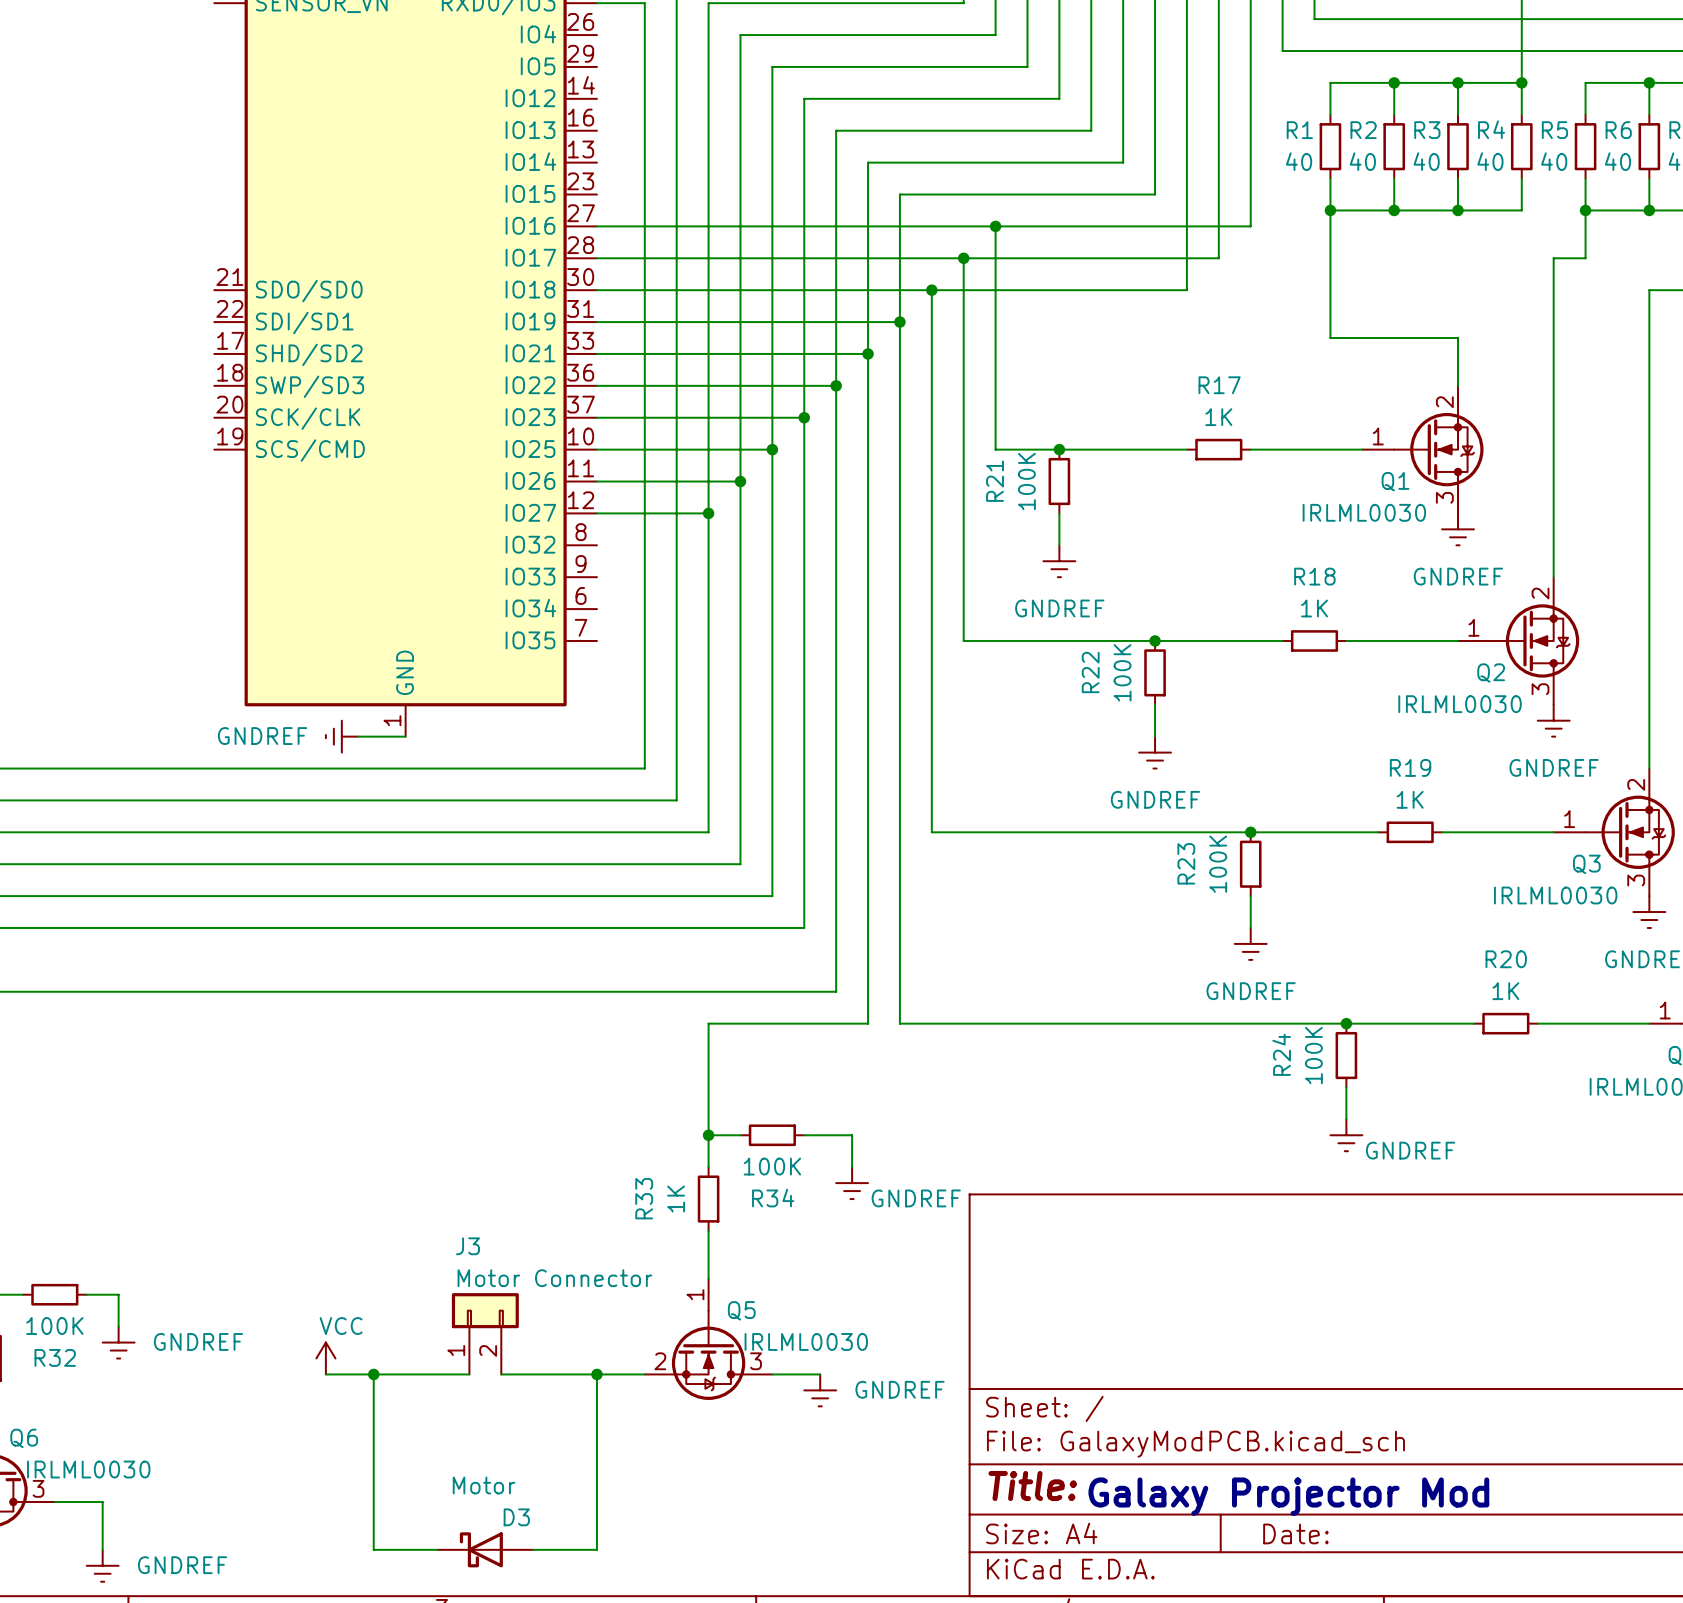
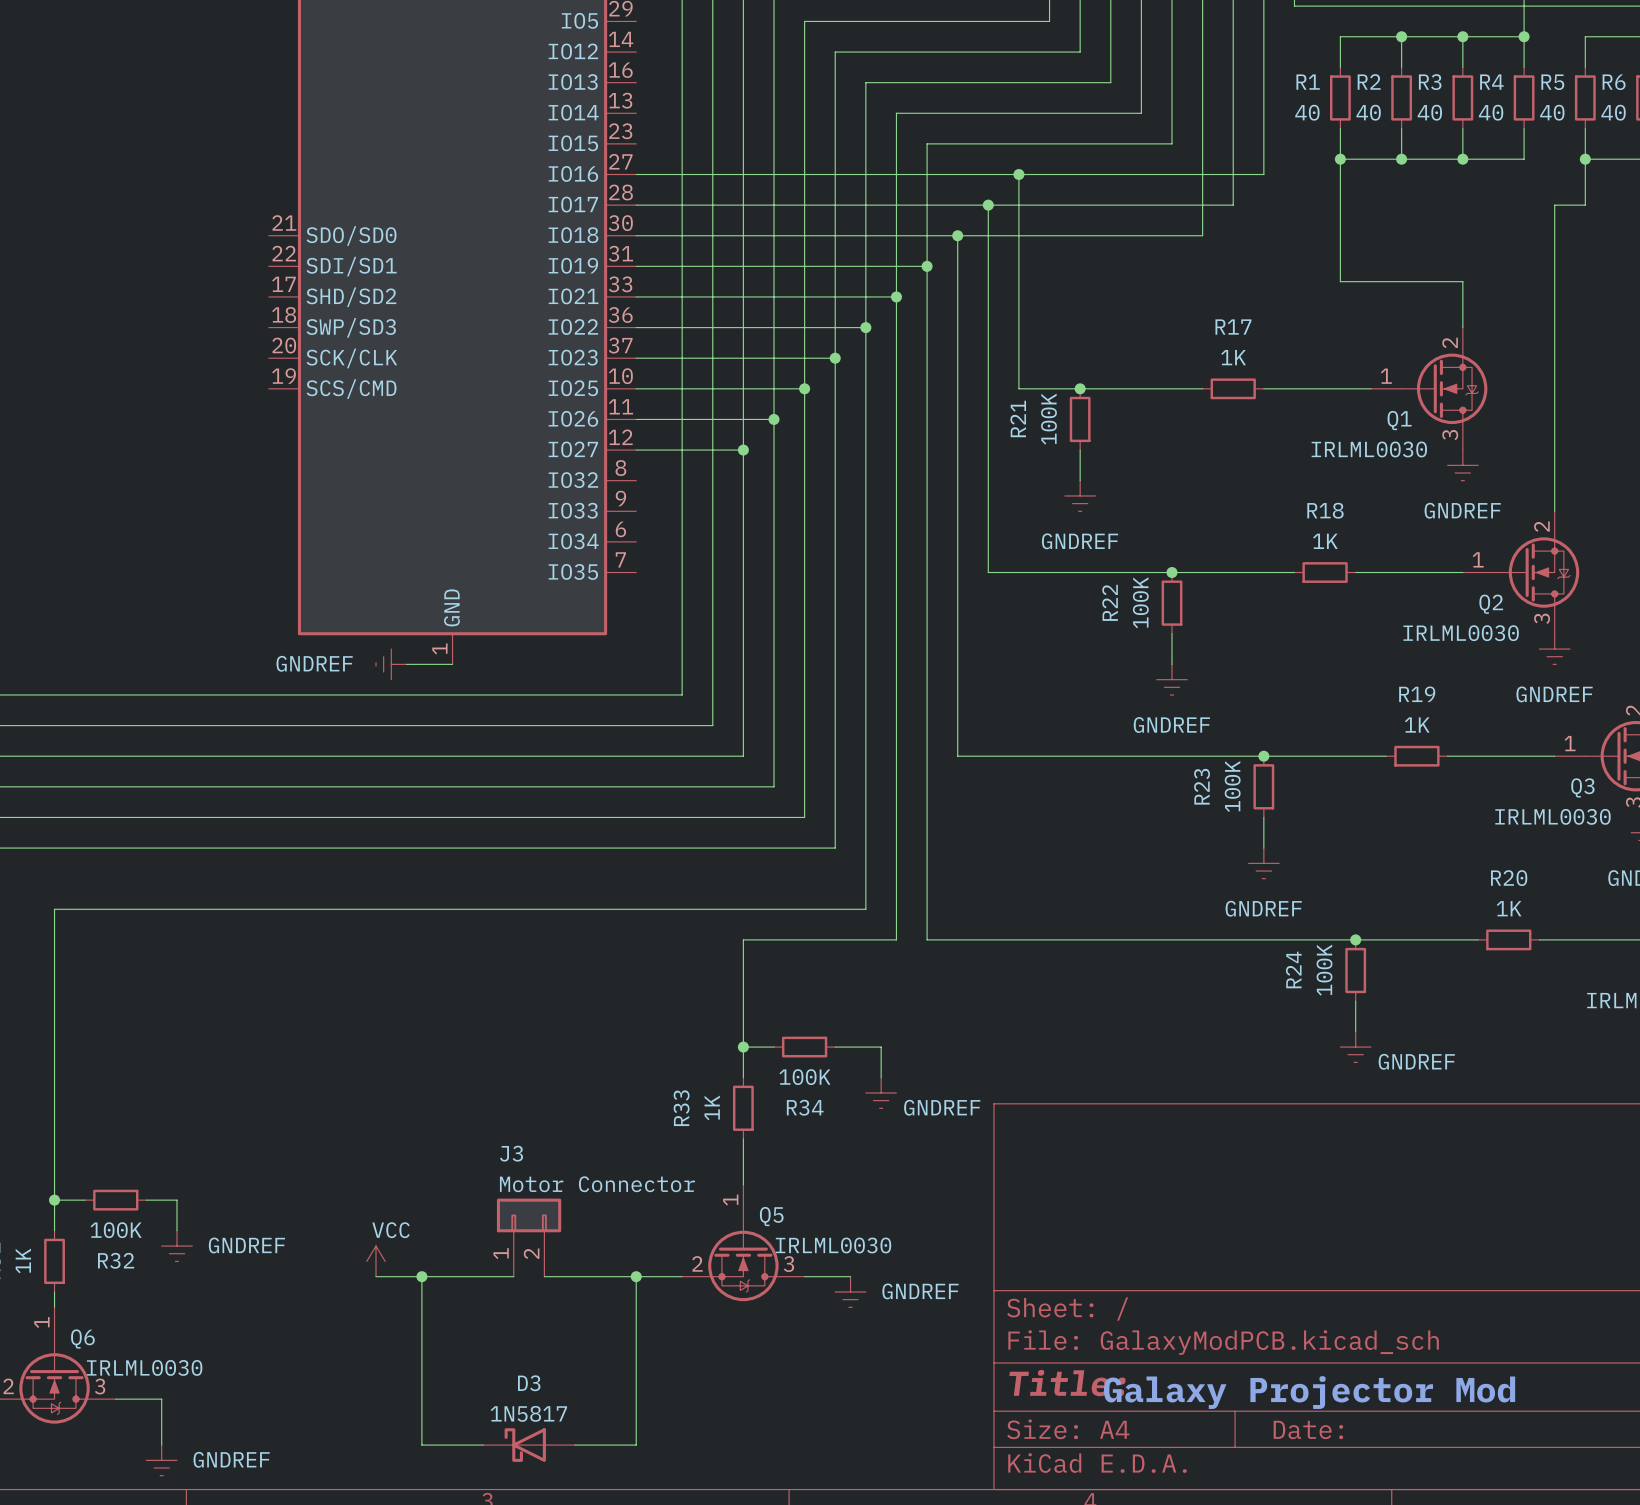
D3 value: Motor (484, 1485) -> 1N5817 (528, 1413)
D3 name position: D3 (516, 1517) -> D3 (529, 1383)

